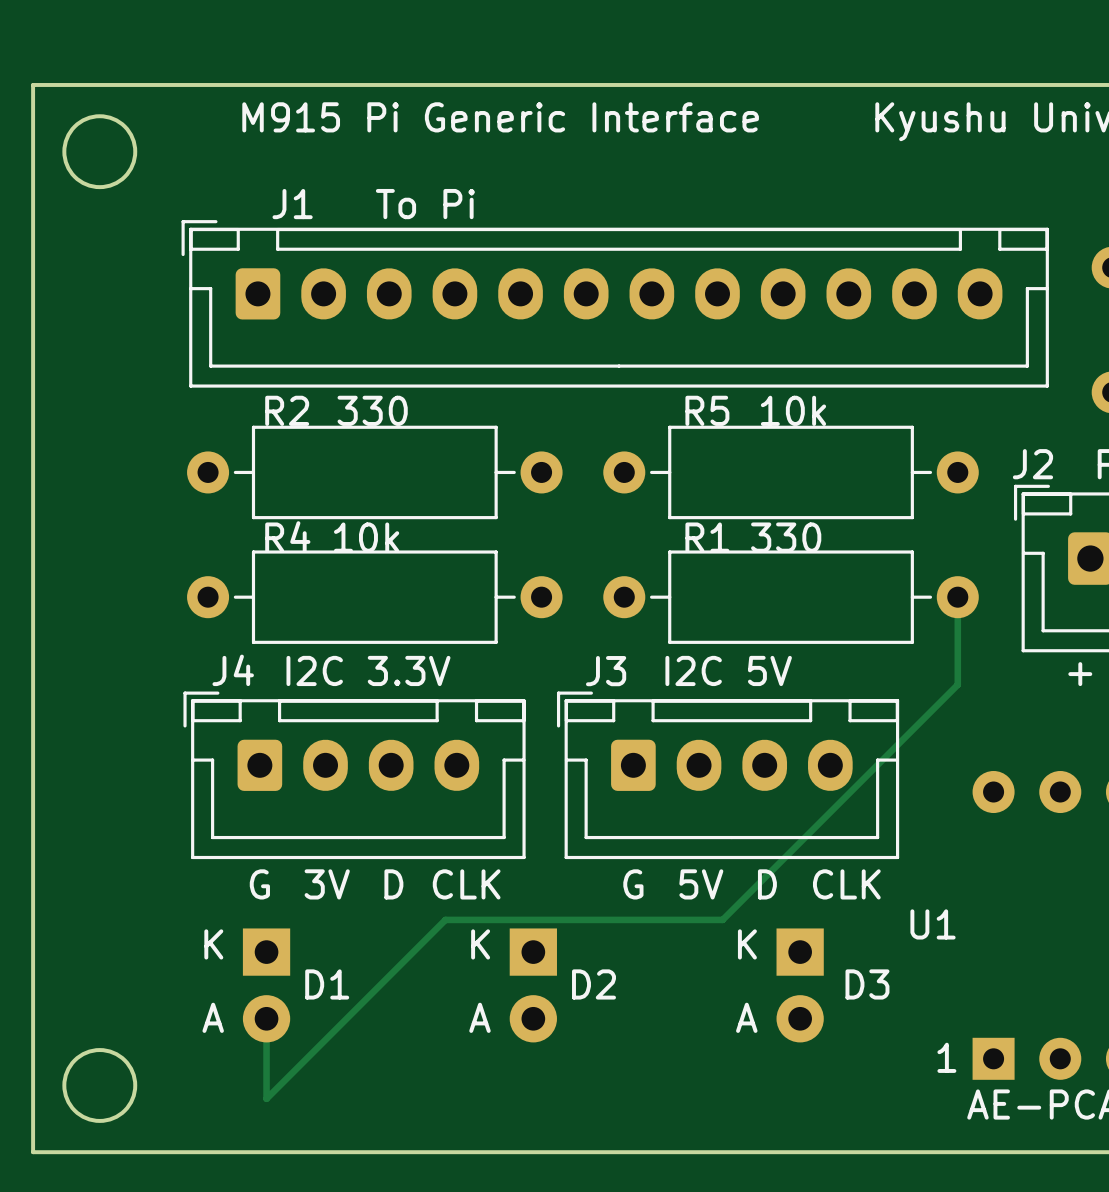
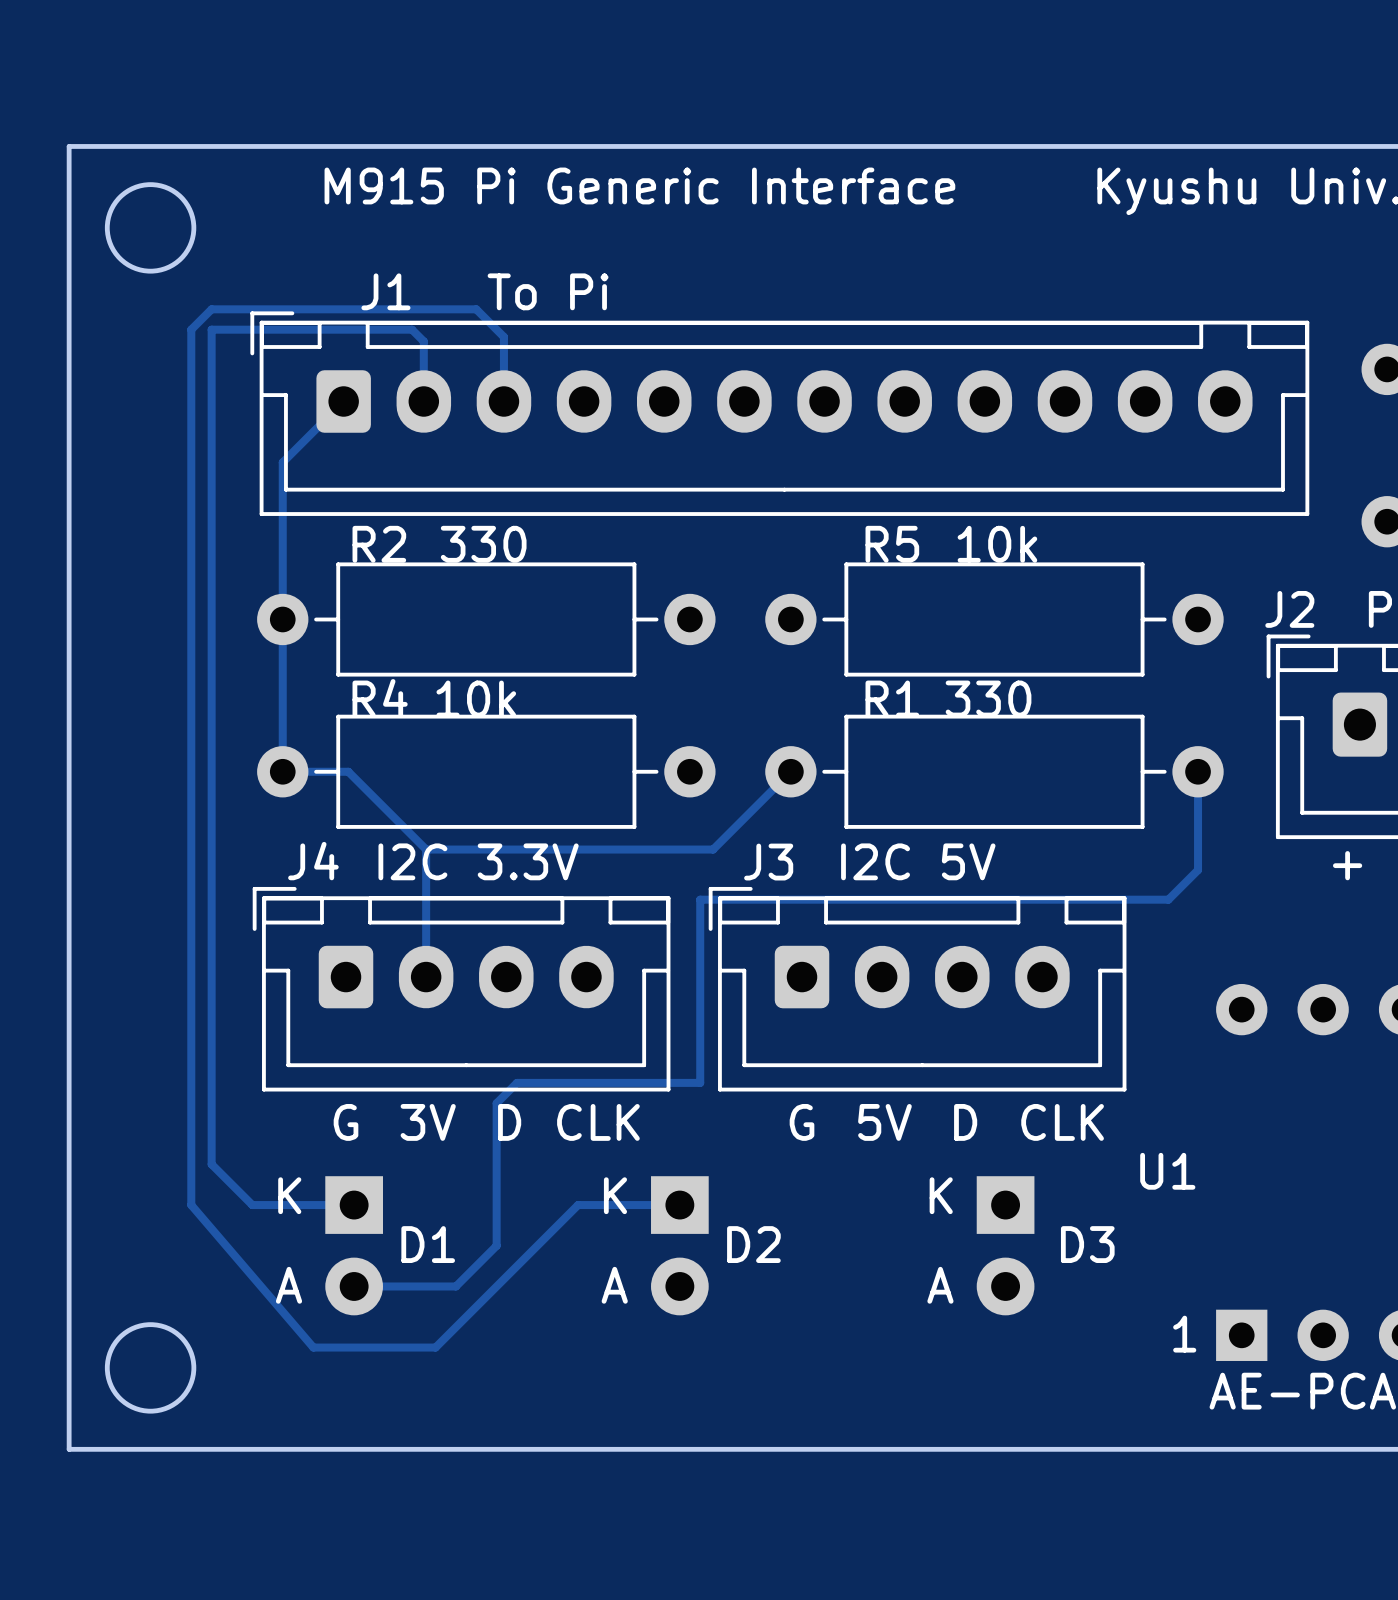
track: none -> (343, 401) (282, 462) (282, 771) (348, 771) (426, 849)
track: none -> (423, 401) (423, 341) (412, 329) (211, 329) (211, 1164) (252, 1205) (354, 1205)
track: none -> (503, 401) (503, 336) (476, 309) (211, 309) (191, 329) (191, 1205) (313, 1347) (435, 1347) (578, 1205) (679, 1205)
track: none -> (790, 771) (713, 849) (426, 849)
track: none -> (426, 849) (426, 977)
track: (957, 677) (957, 684) (722, 919) (445, 919) (266, 1098) (266, 1018) -> (1198, 870) (1168, 899) (700, 899) (700, 1082) (517, 1082) (496, 1103) (496, 1245) (455, 1286) (354, 1286)

